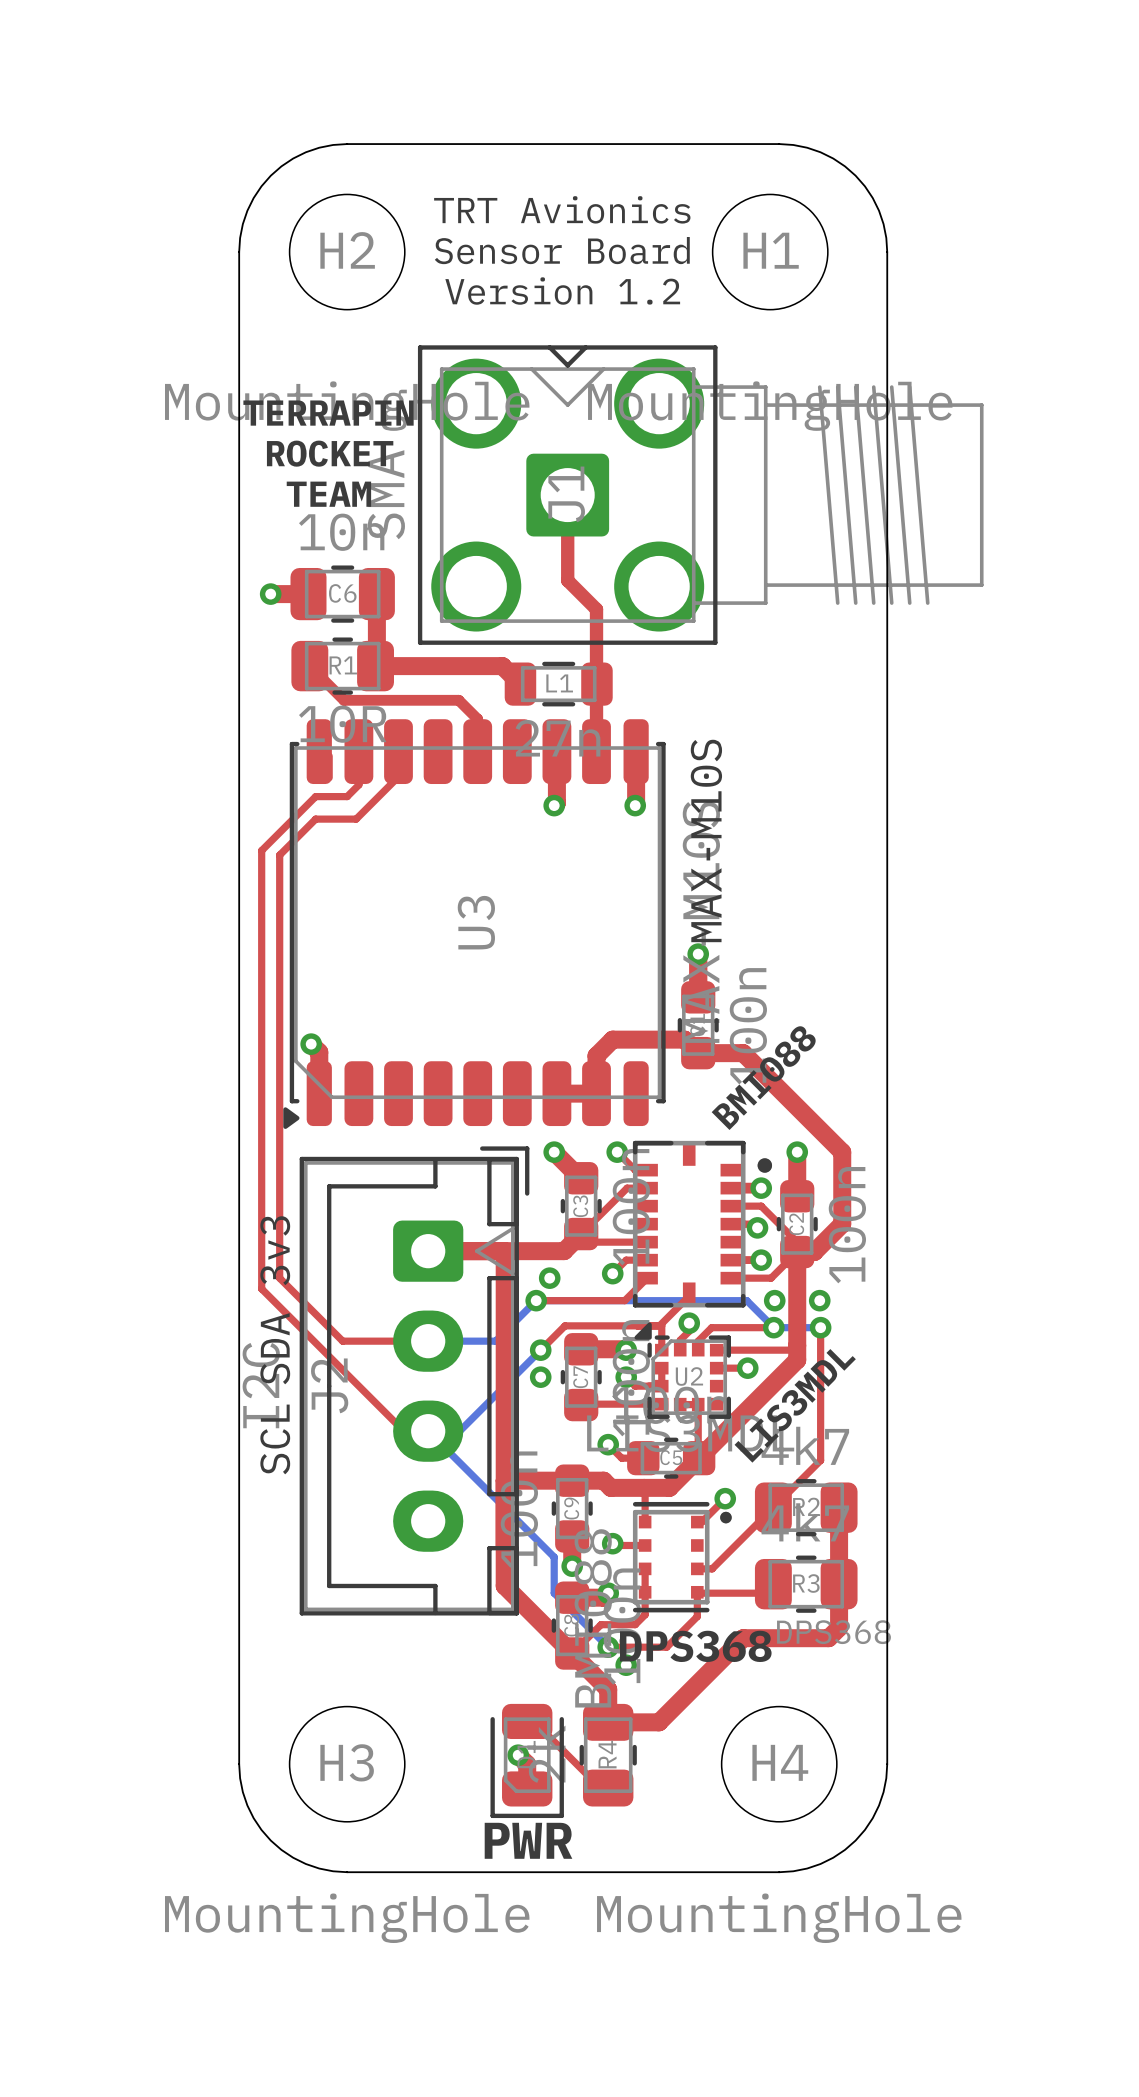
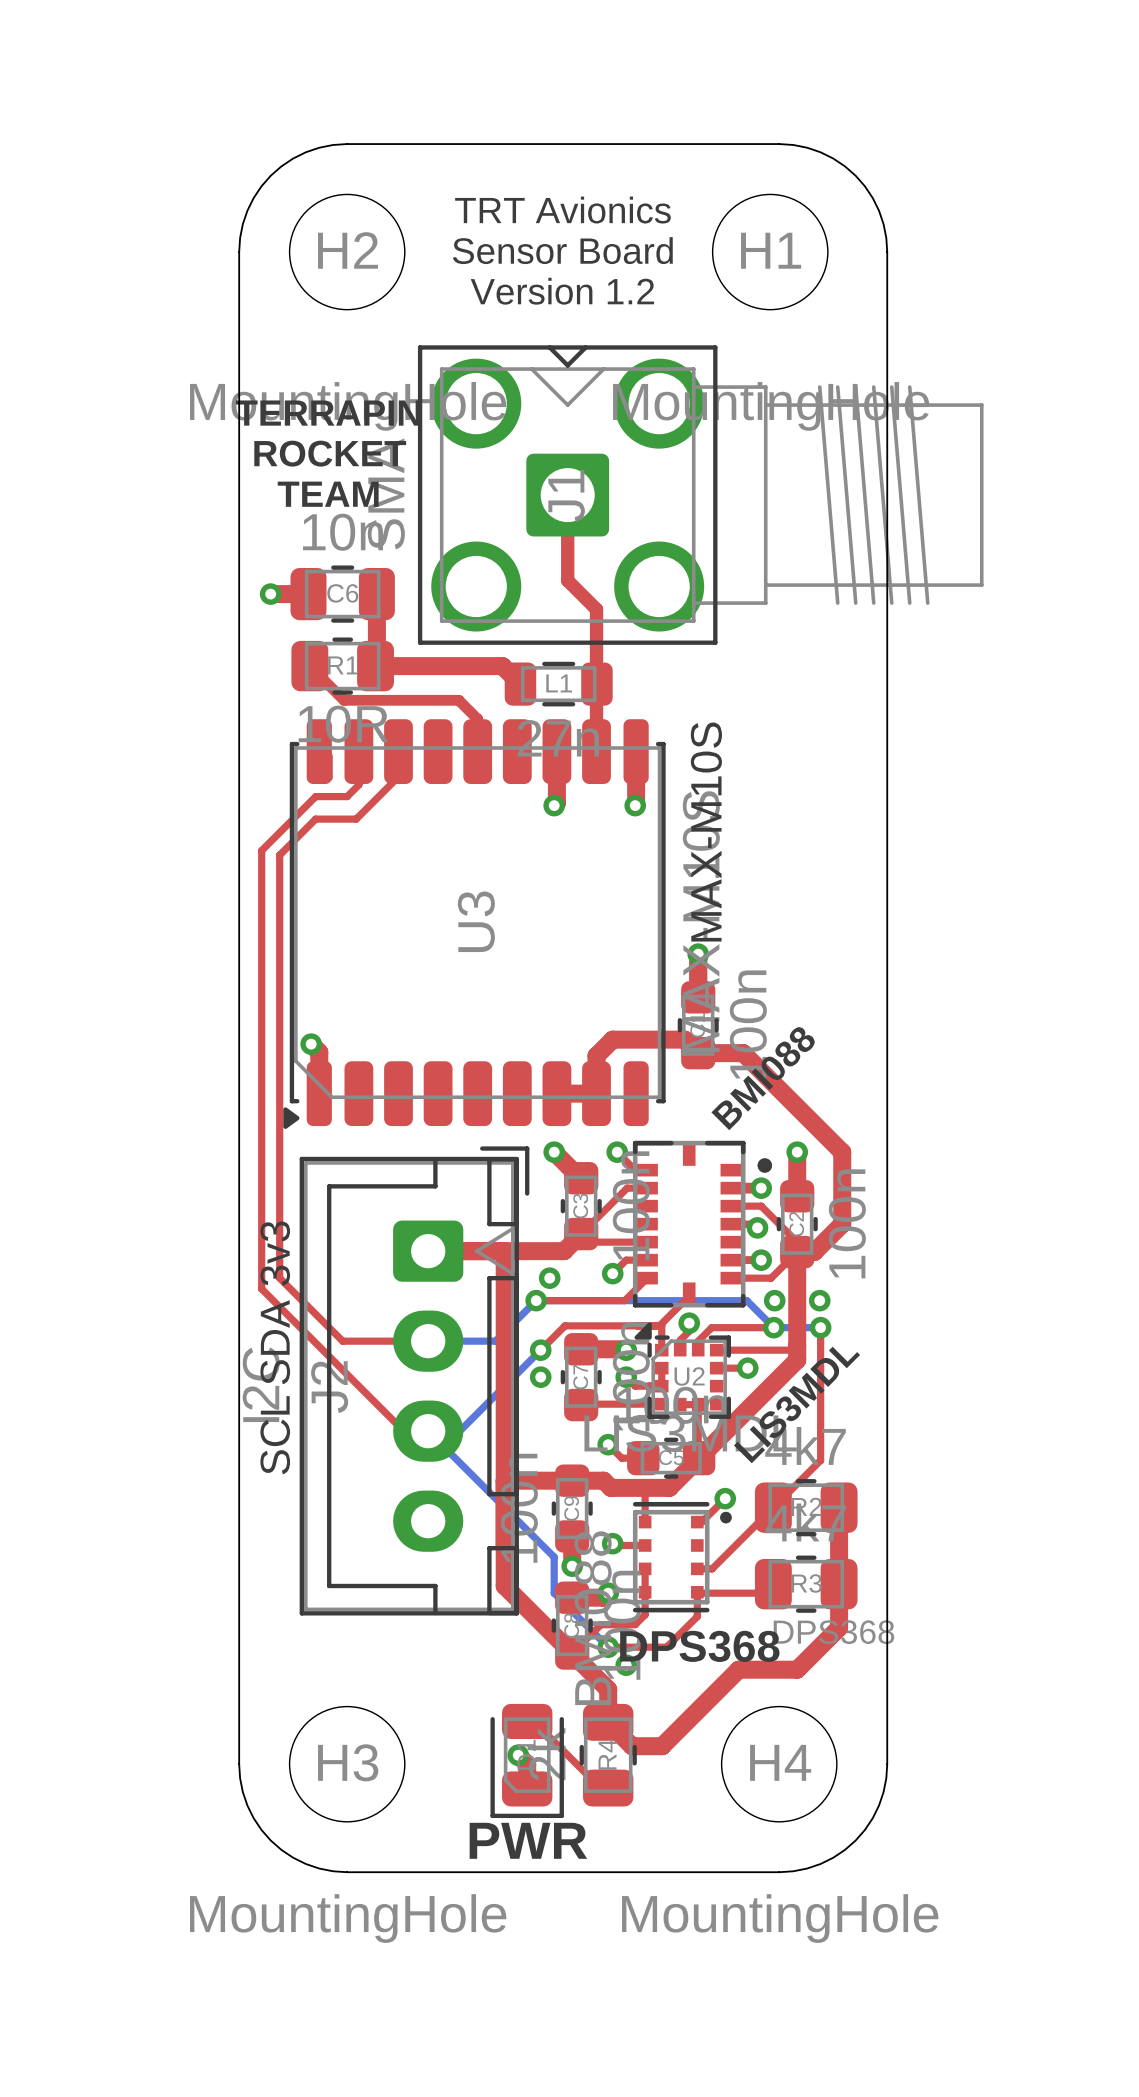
top track: (828, 1638) (743, 1638) (659, 1722) (608, 1722) -> (828, 1638) (797, 1669) (738, 1669) (662, 1746) (632, 1746) (608, 1722)

